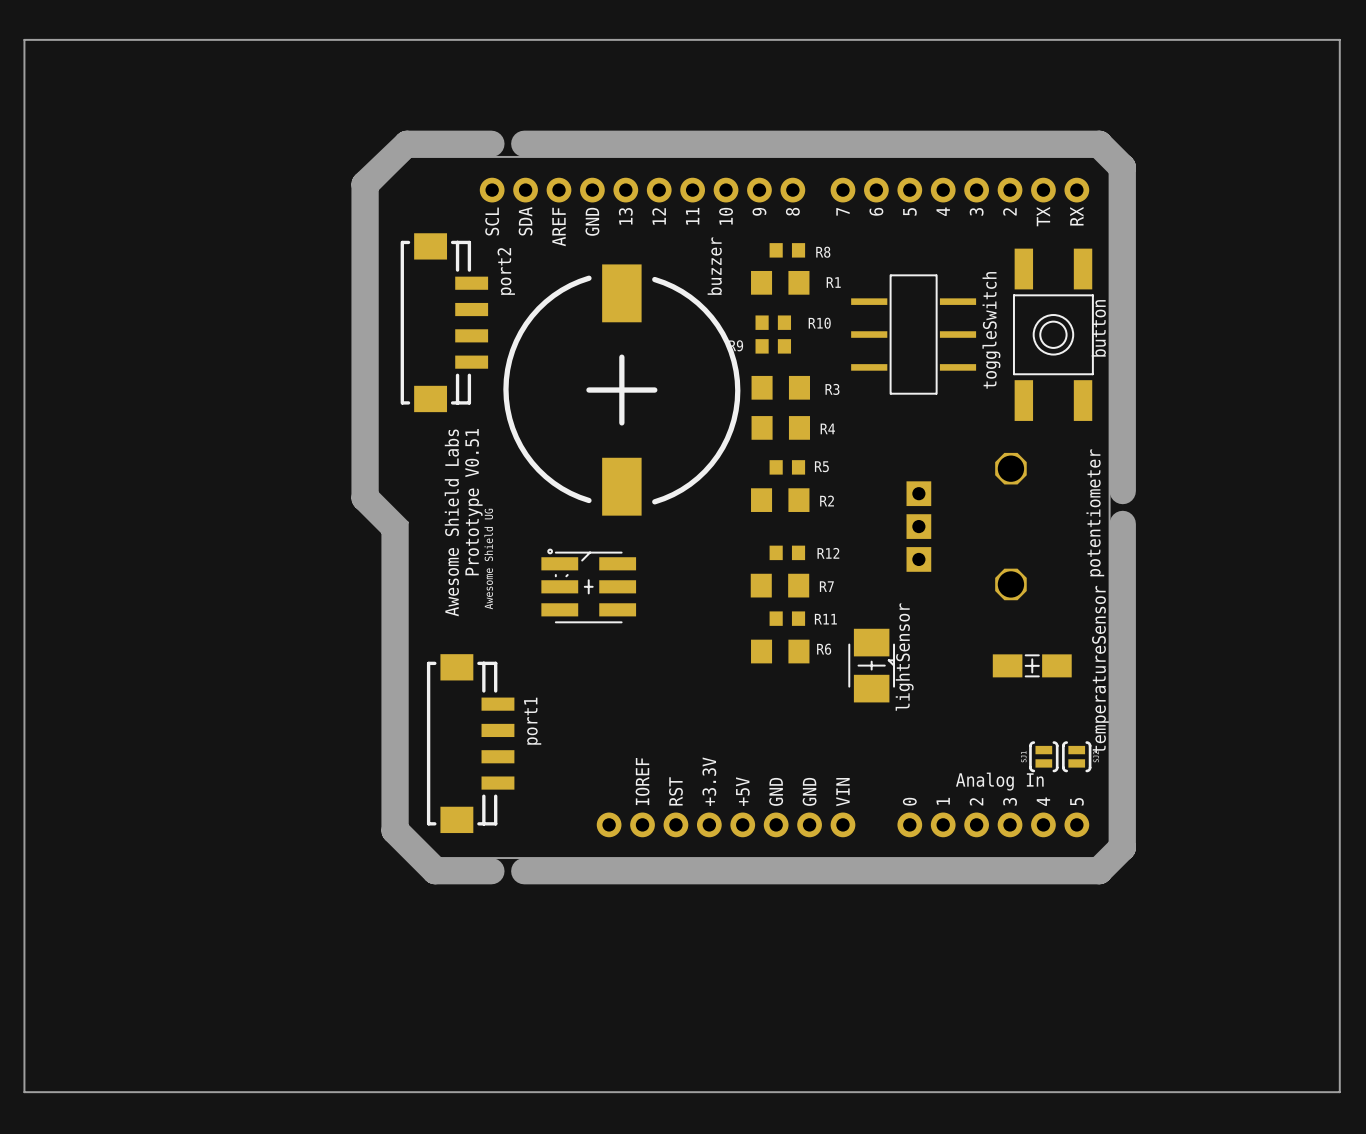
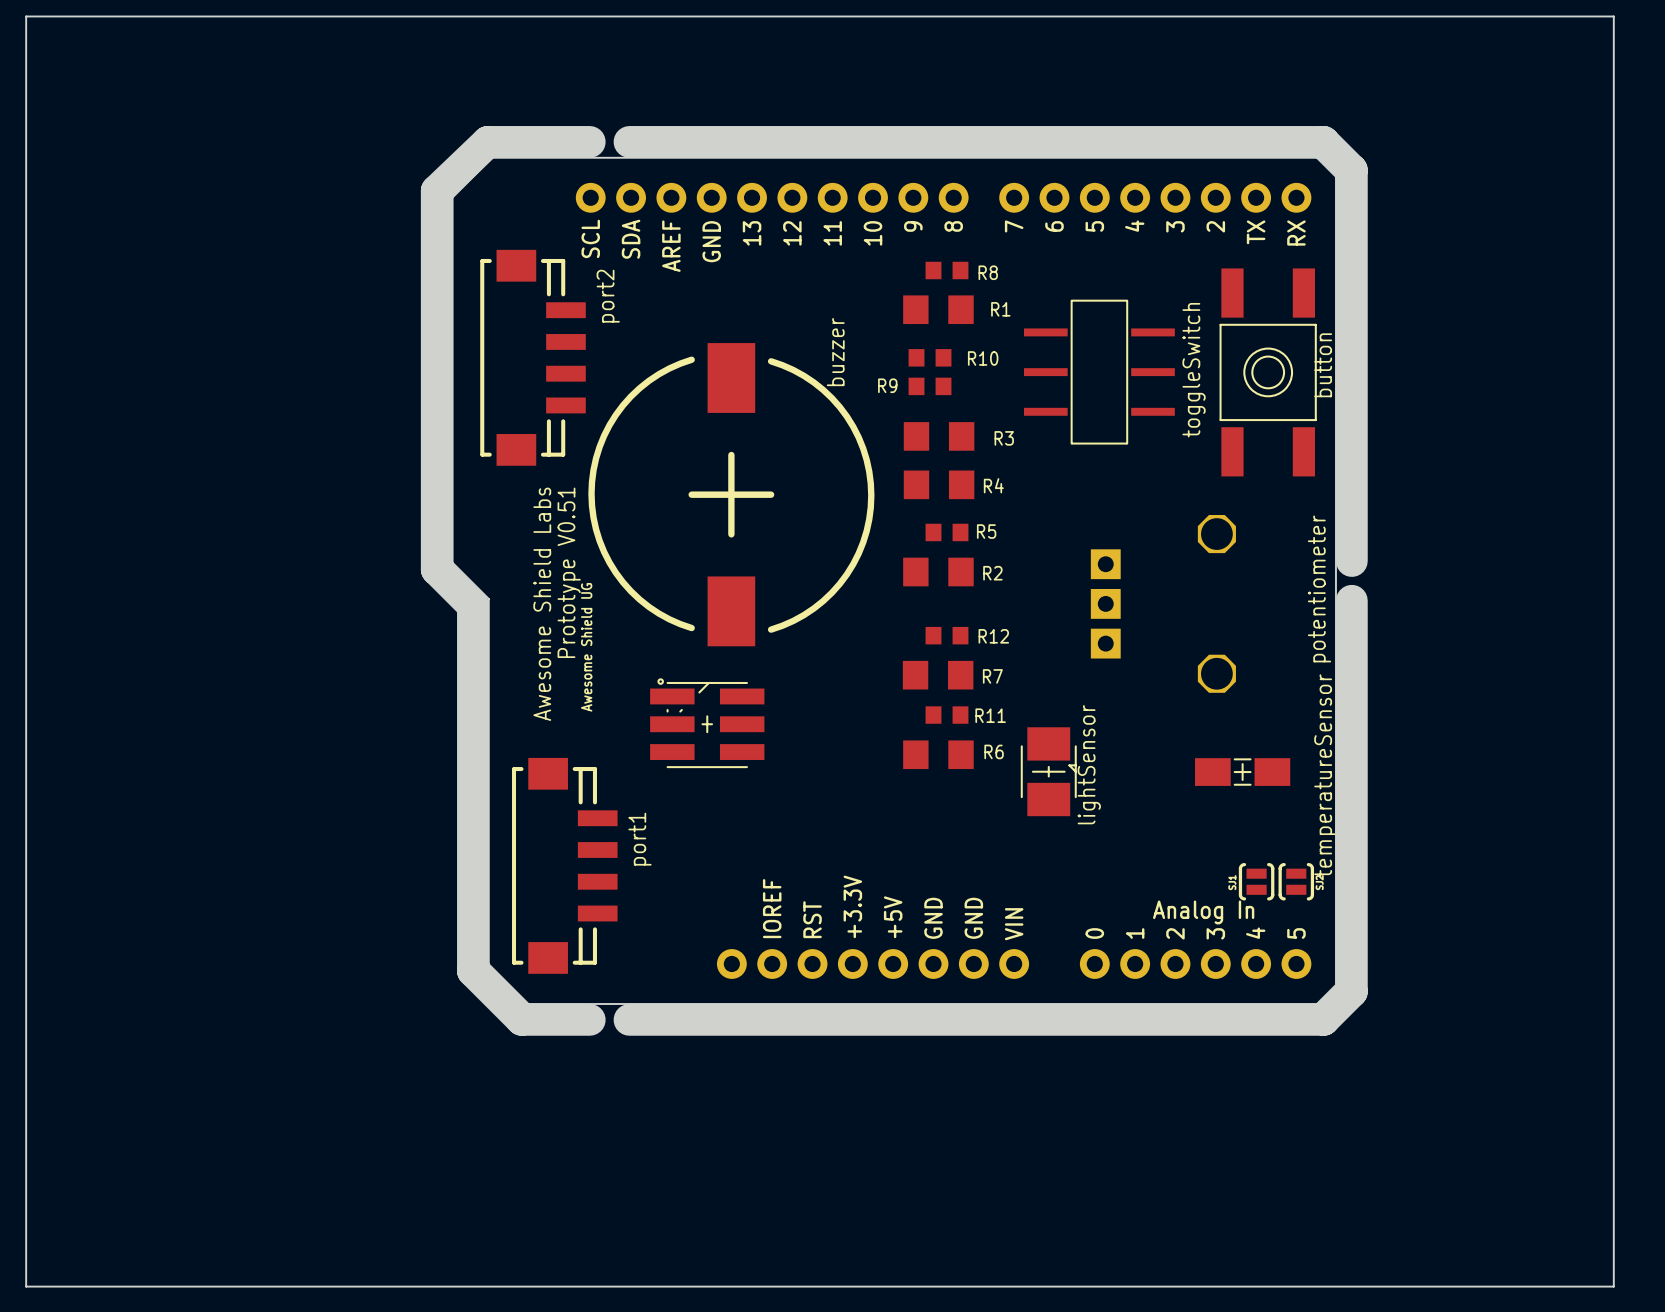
text position: buzzer (714, 266) -> buzzer (835, 352)
part position: (621, 390) -> (731, 494)
part position: (588, 585) -> (707, 723)

